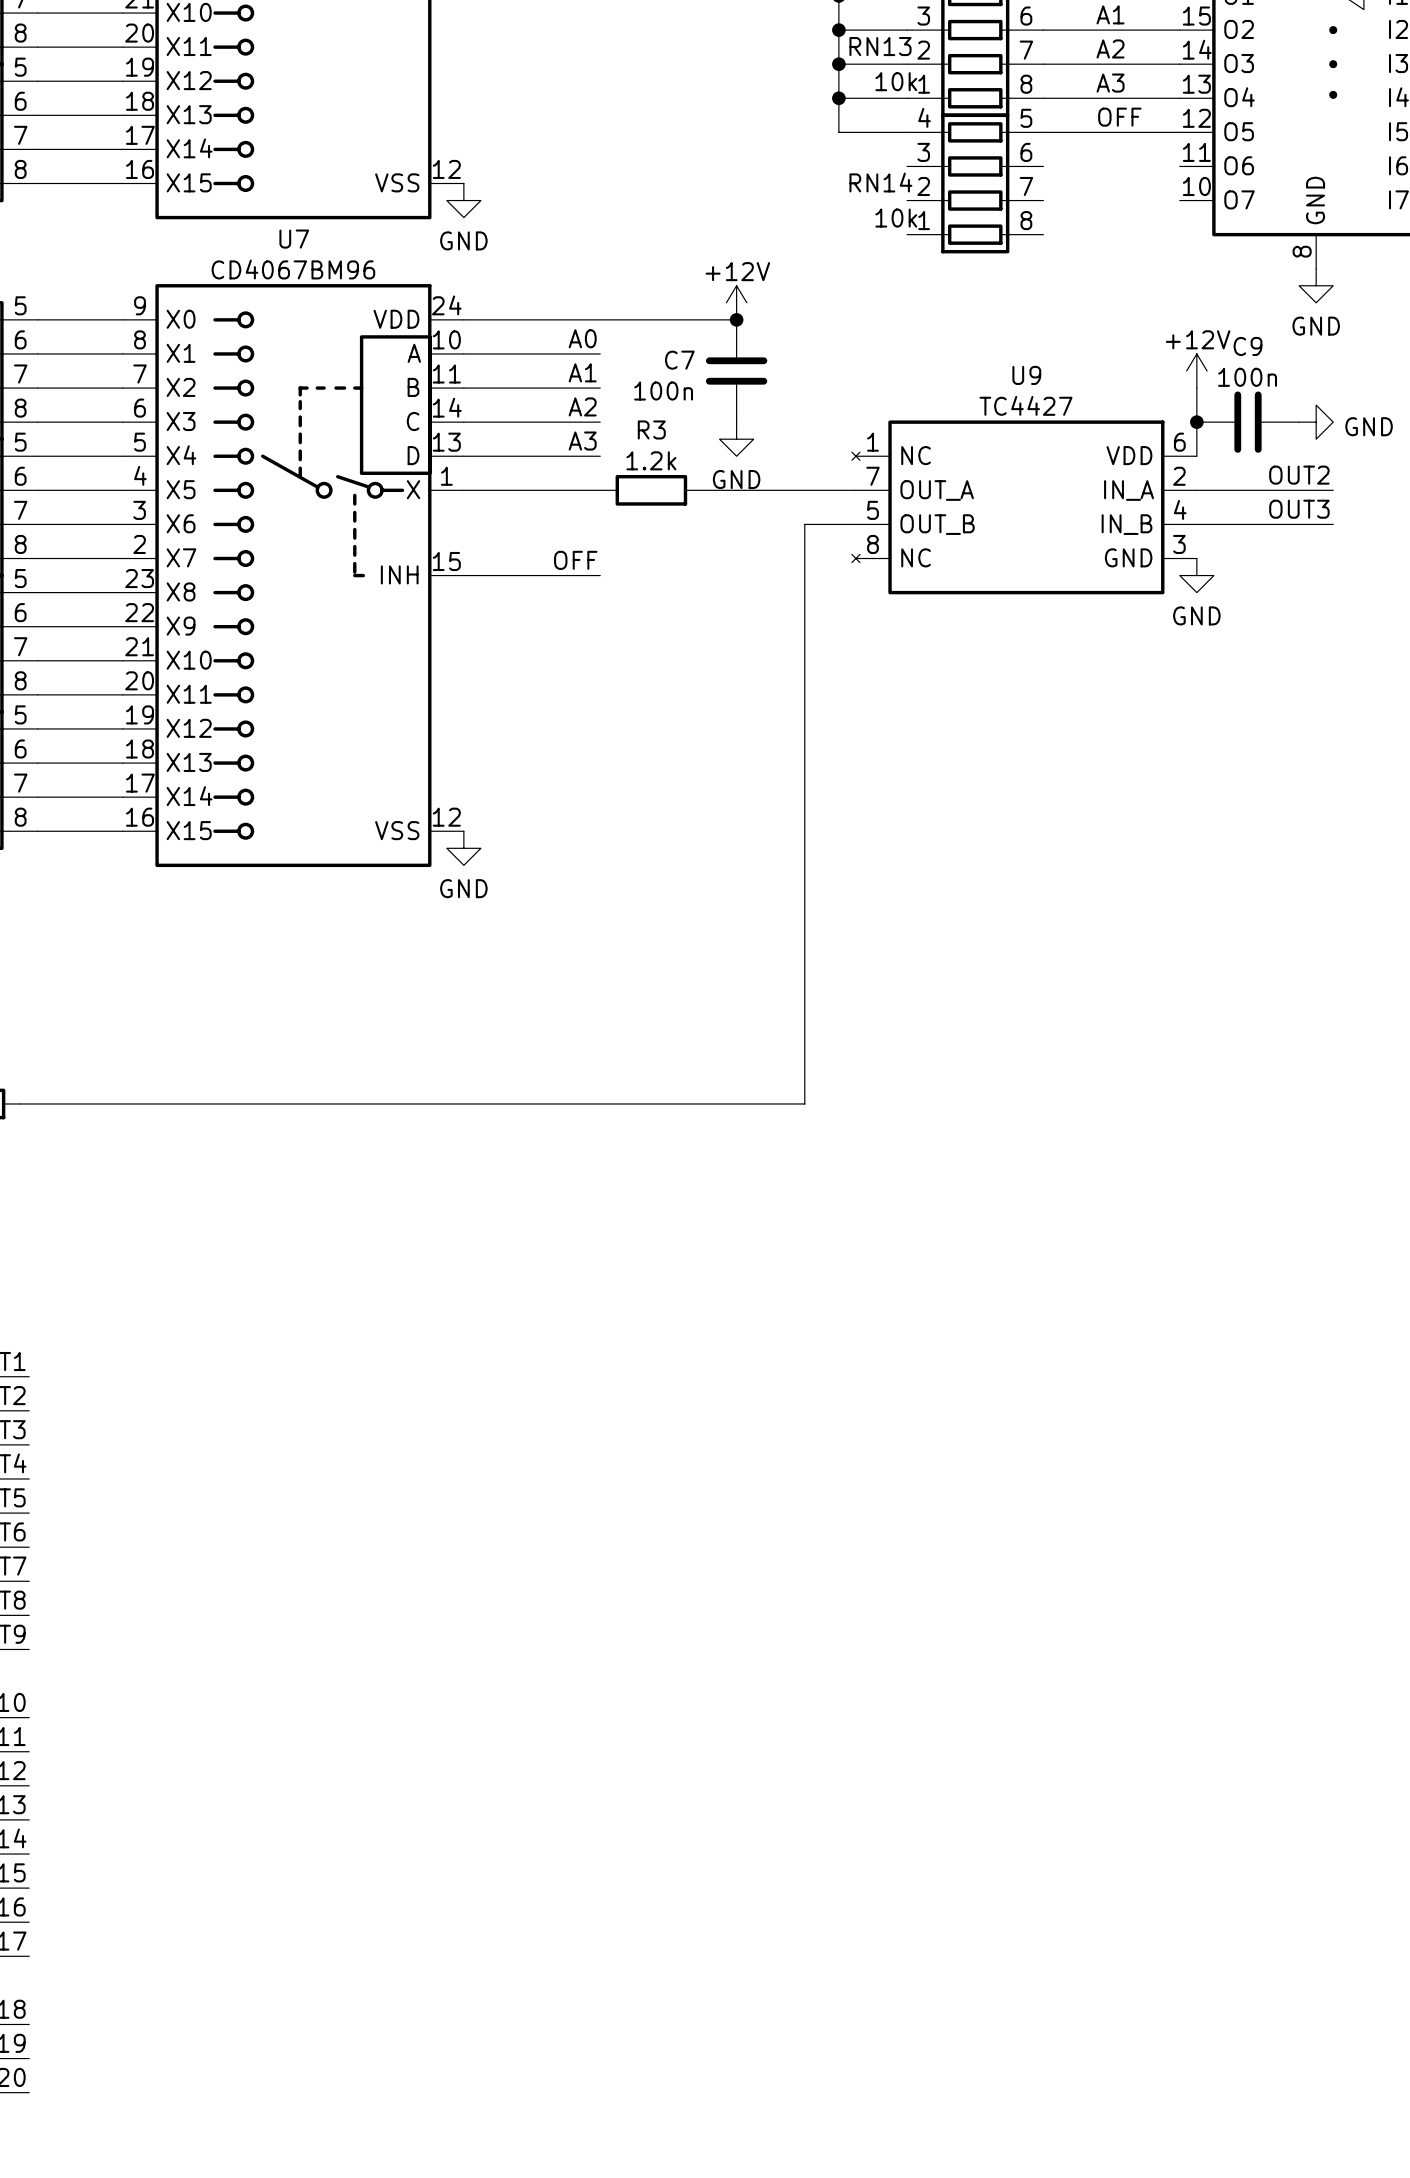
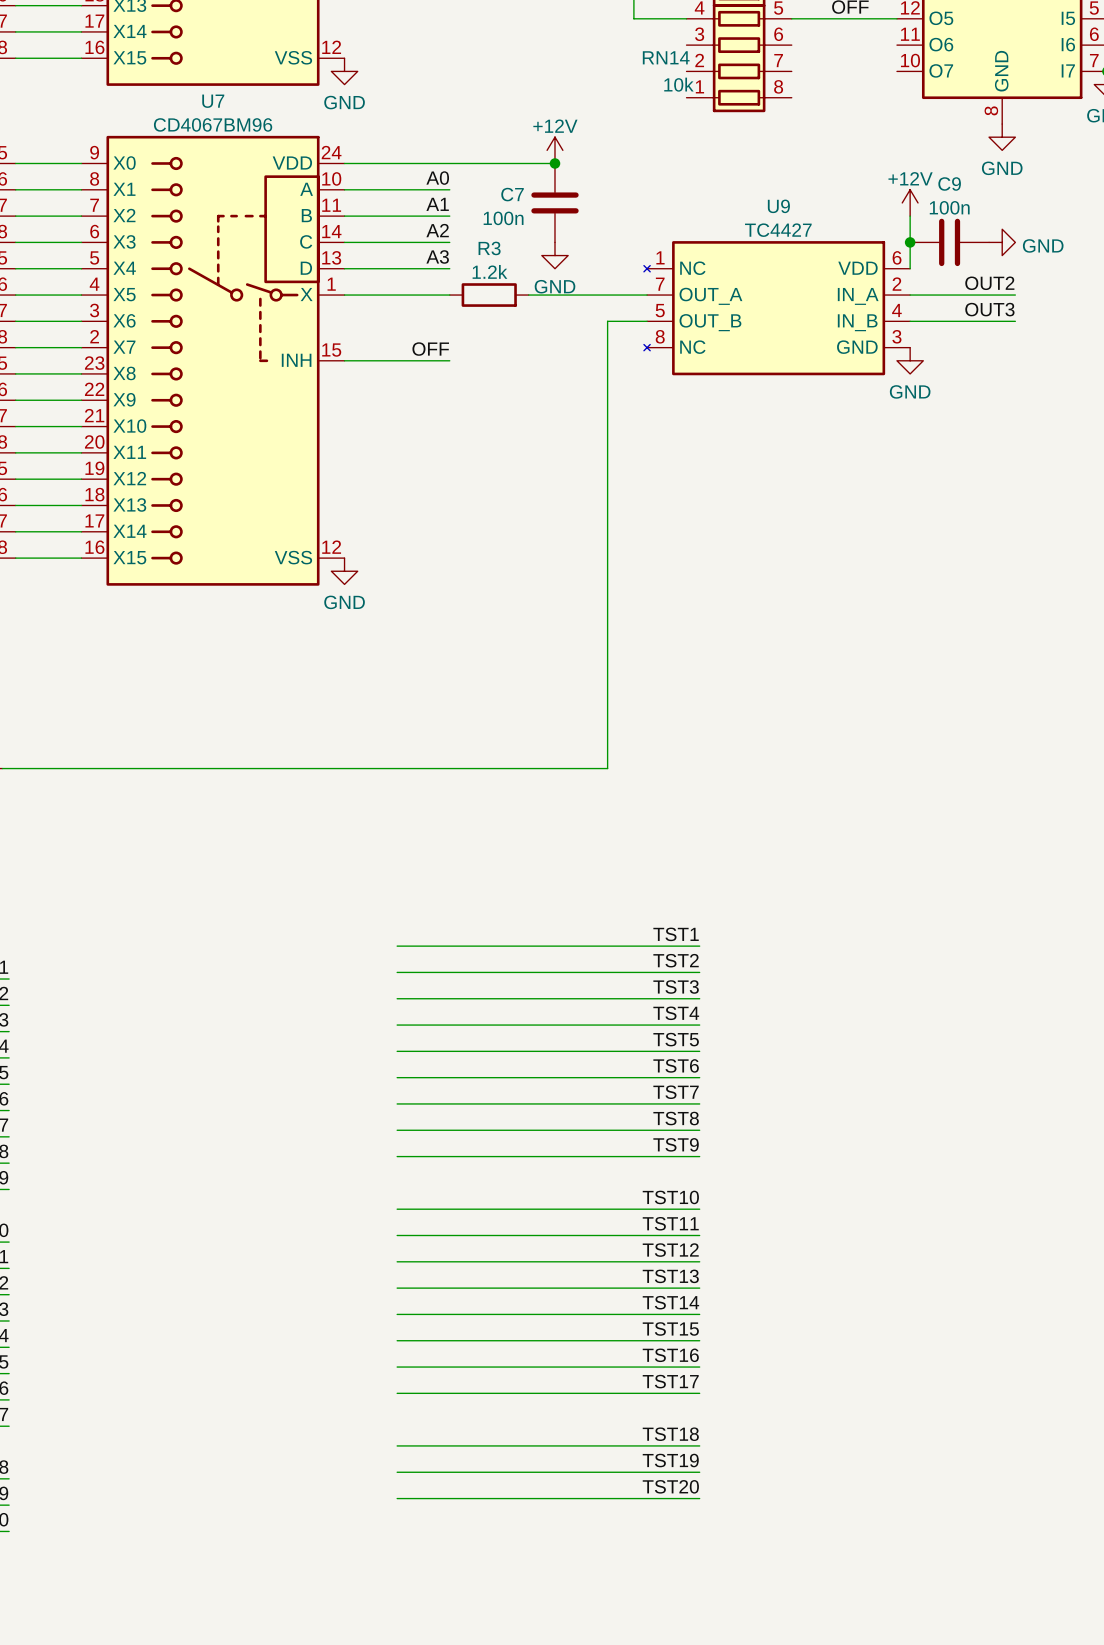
label: none -> TST1 (676, 934)
wire: none -> (397, 946) (699, 946)
label: none -> TST2 (676, 960)
wire: none -> (397, 972) (699, 972)
label: none -> TST3 (676, 986)
wire: none -> (397, 998) (699, 998)
label: none -> TST4 (676, 1013)
wire: none -> (397, 1025) (699, 1025)
label: none -> TST5 (676, 1039)
wire: none -> (397, 1051) (699, 1051)
label: none -> TST6 (676, 1065)
wire: none -> (397, 1077) (699, 1077)
label: none -> TST7 (676, 1092)
wire: none -> (397, 1103) (699, 1103)
label: none -> TST8 (676, 1118)
wire: none -> (397, 1130) (699, 1130)
label: none -> TST9 (676, 1144)
wire: none -> (397, 1156) (699, 1156)
label: none -> TST10 (670, 1197)
wire: none -> (397, 1209) (699, 1209)
label: none -> TST11 (670, 1223)
wire: none -> (397, 1235) (699, 1235)
label: none -> TST12 (670, 1250)
wire: none -> (397, 1261) (699, 1261)
label: none -> TST13 (670, 1276)
wire: none -> (397, 1288) (699, 1288)
label: none -> TST14 (670, 1302)
wire: none -> (397, 1314) (699, 1314)
label: none -> TST15 (670, 1328)
wire: none -> (397, 1340) (699, 1340)
label: none -> TST16 (670, 1355)
wire: none -> (397, 1367) (699, 1367)
label: none -> TST17 (670, 1381)
wire: none -> (397, 1393) (699, 1393)
label: none -> TST18 (670, 1434)
wire: none -> (397, 1445) (699, 1445)
label: none -> TST19 (670, 1460)
wire: none -> (397, 1472) (699, 1472)
label: none -> TST20 (670, 1486)
wire: none -> (397, 1498) (699, 1498)

